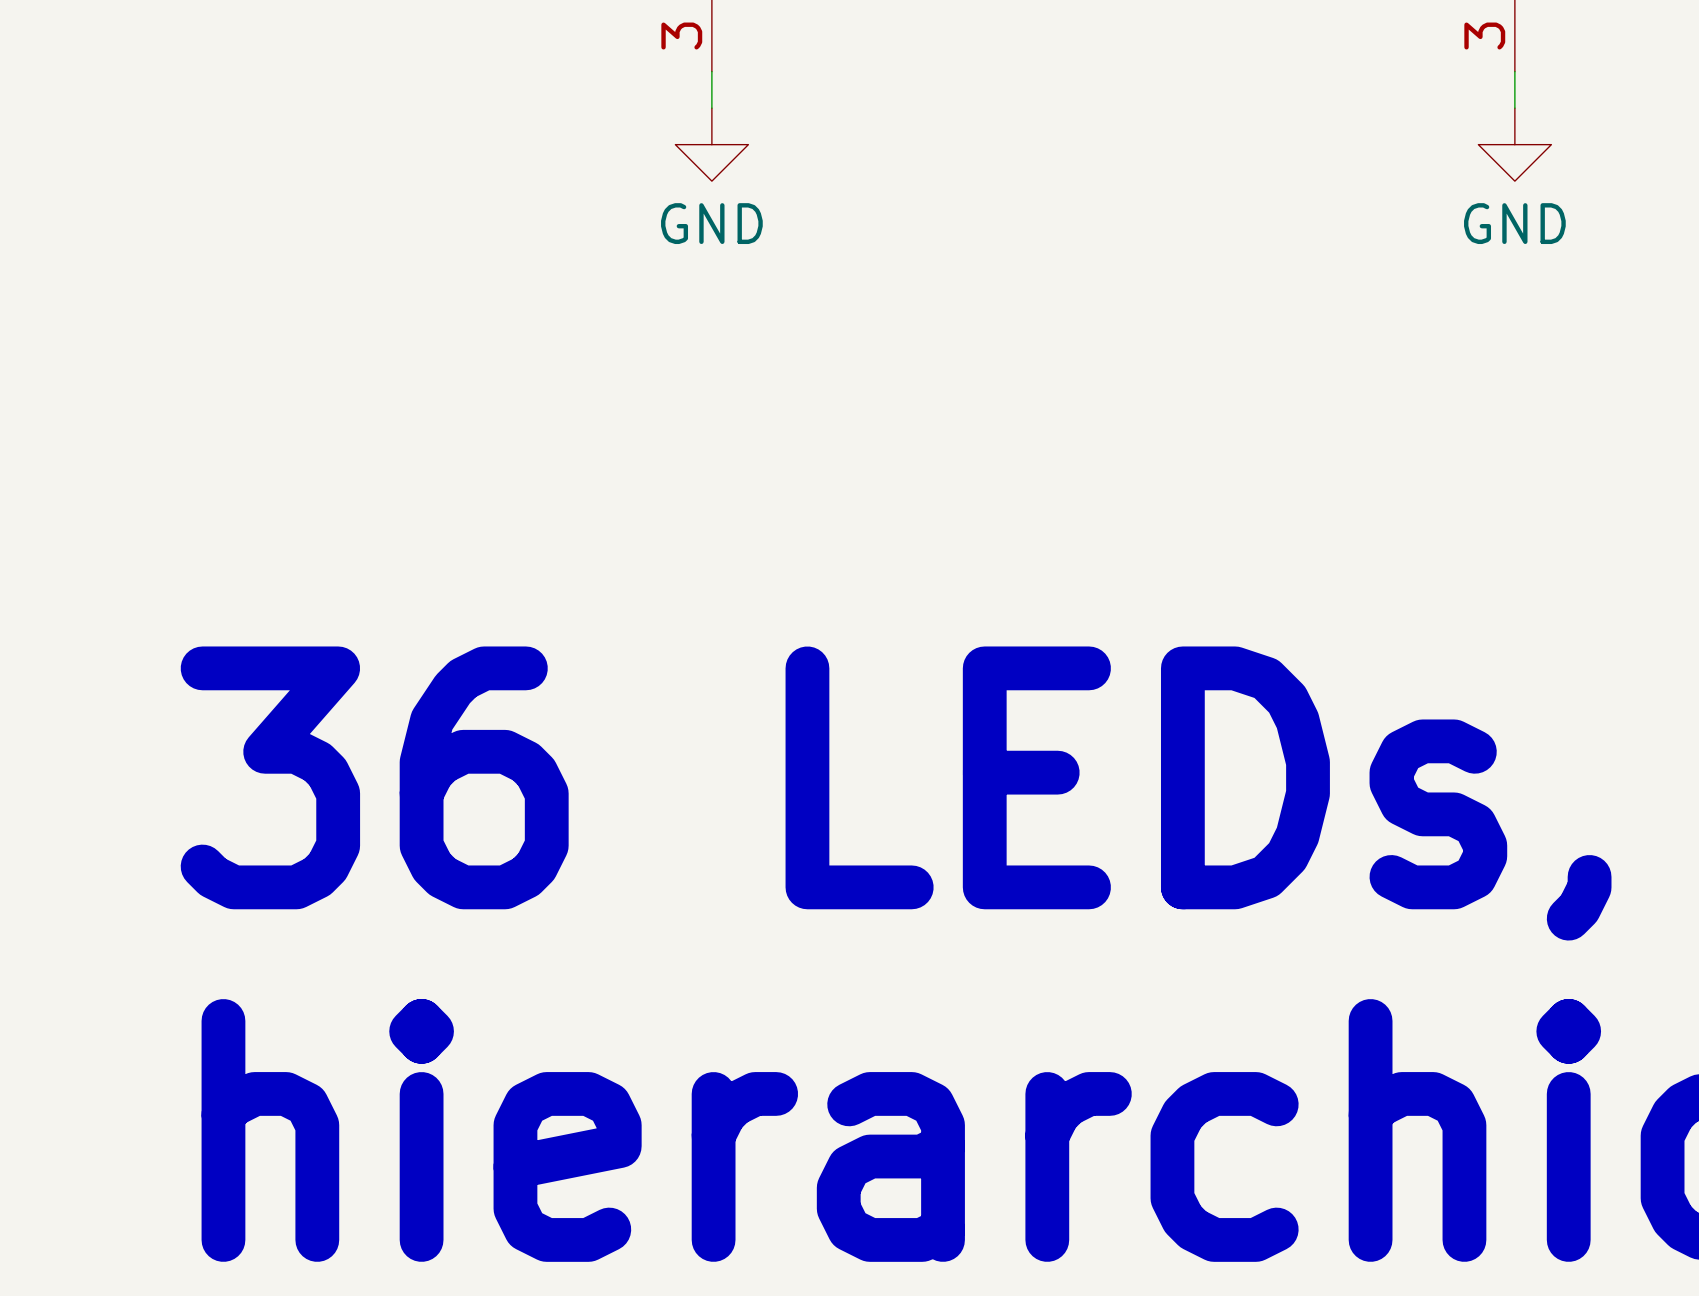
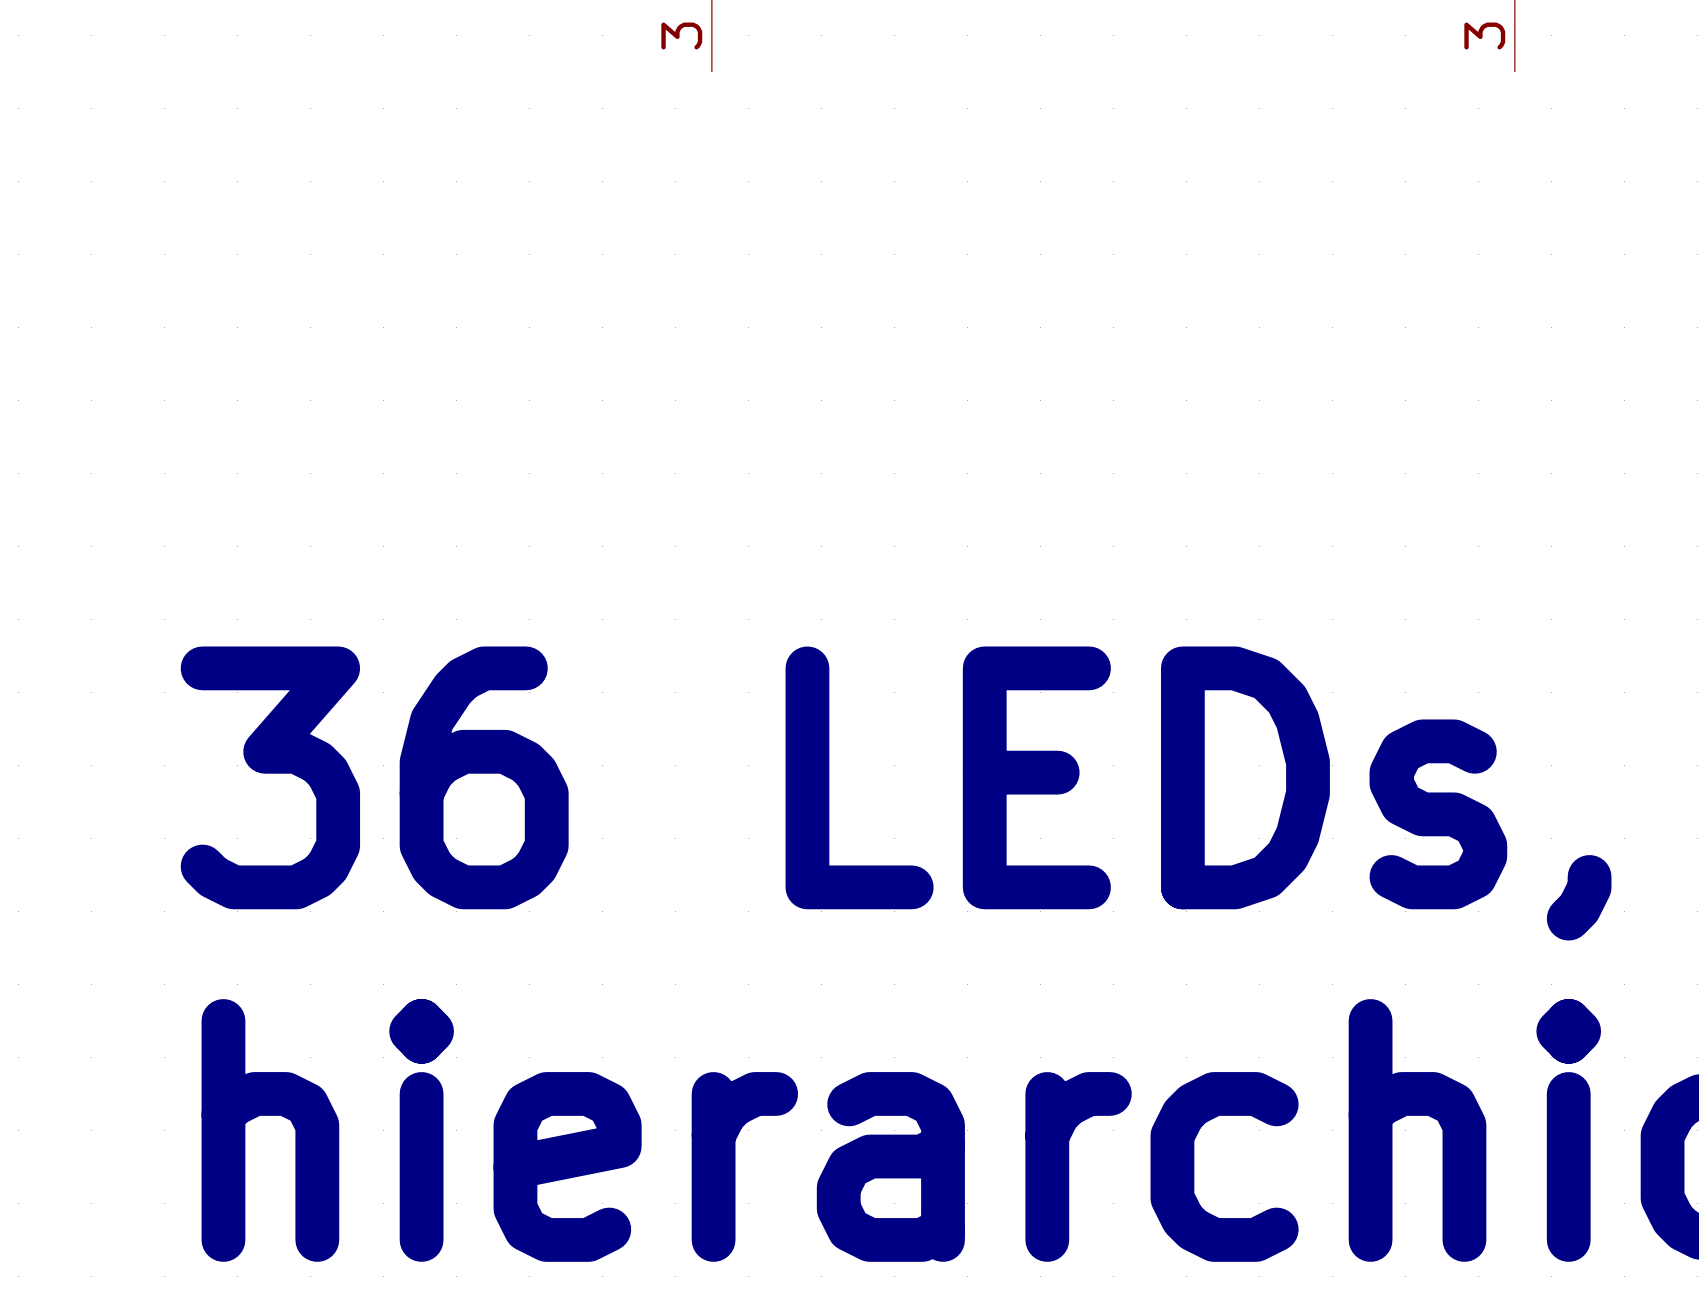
wire: (711, 71) (711, 108) -> none
wire: (1514, 71) (1514, 108) -> none
power symbol: GND (711, 144) -> none
power symbol: GND (1514, 144) -> none

